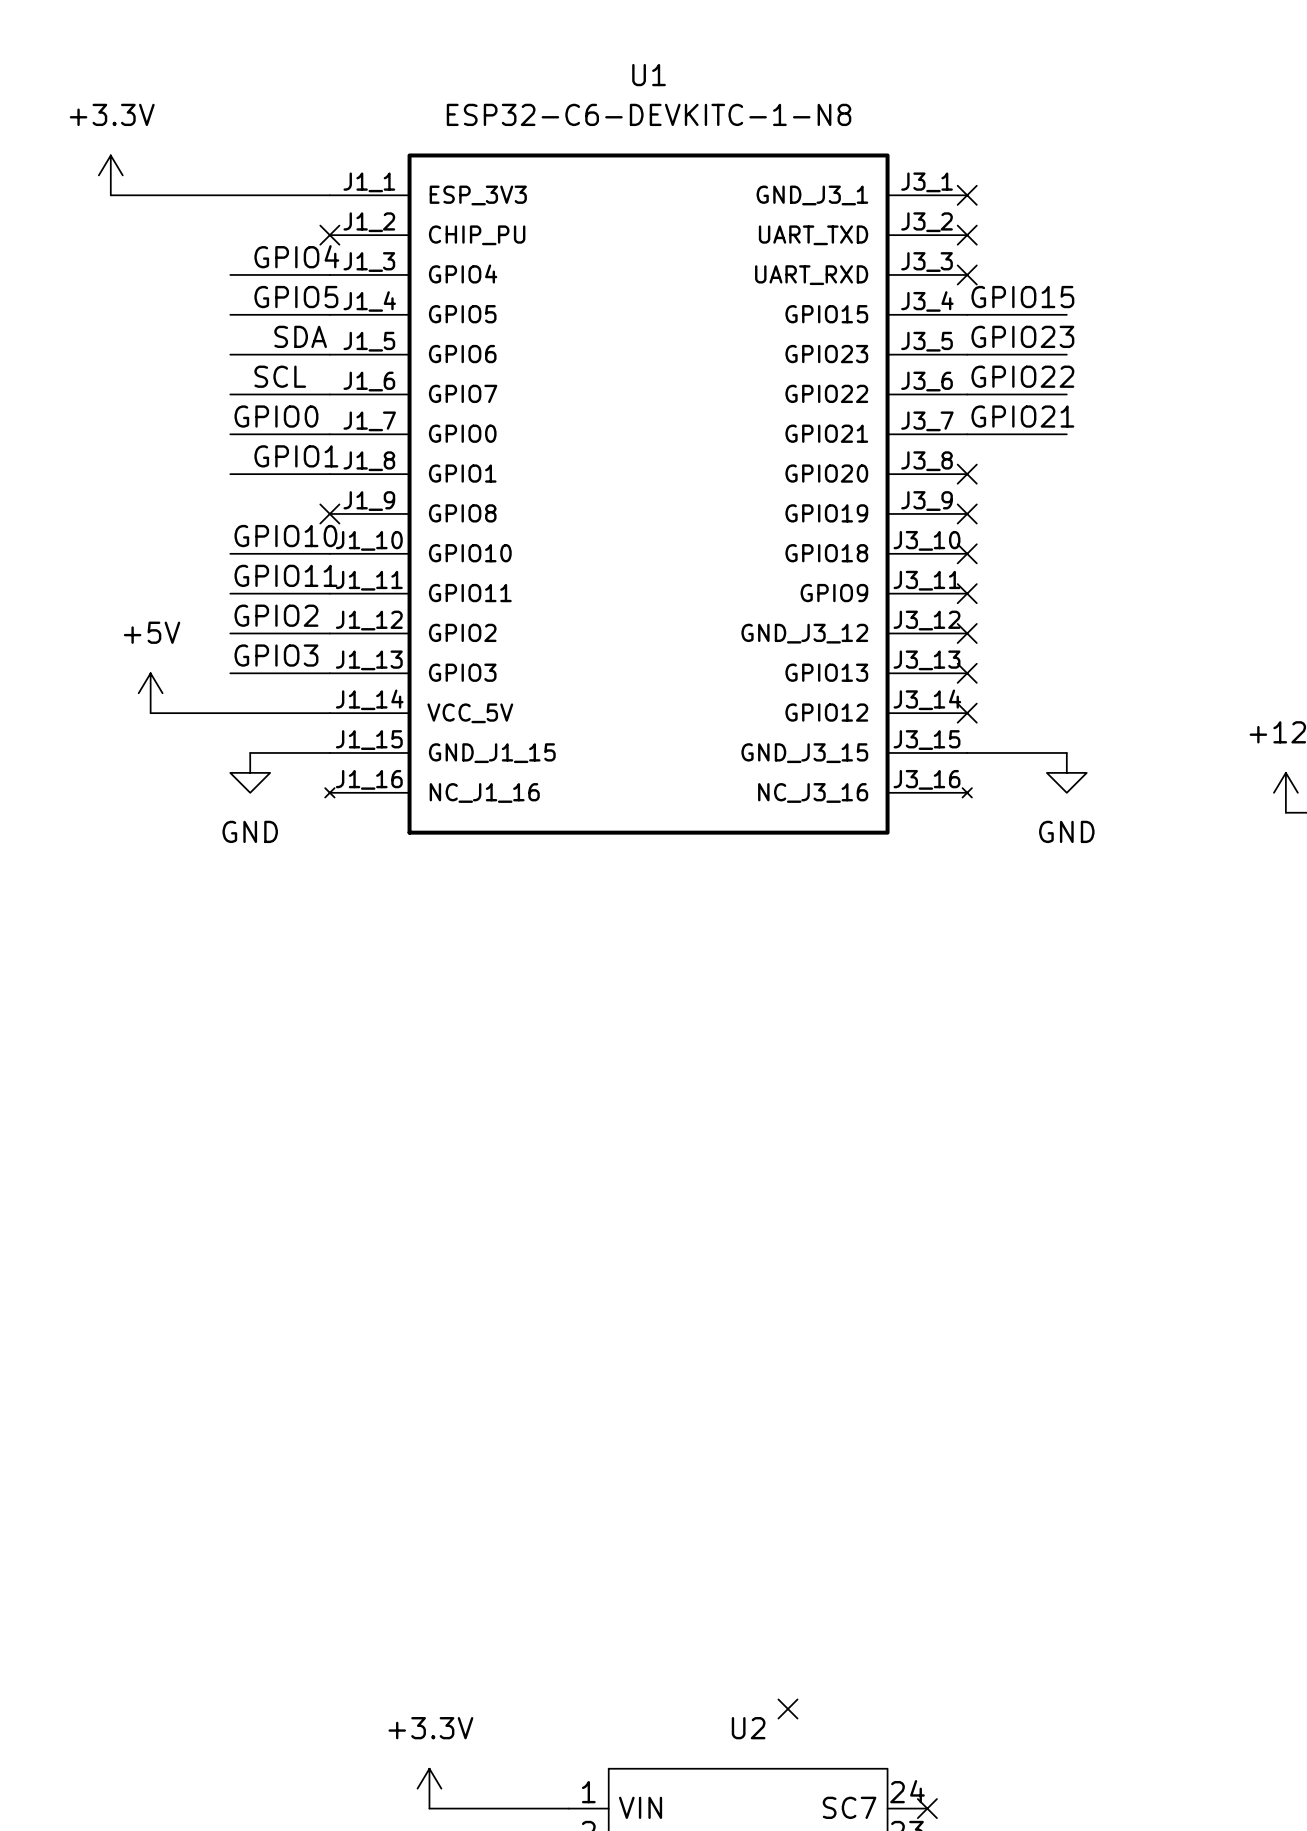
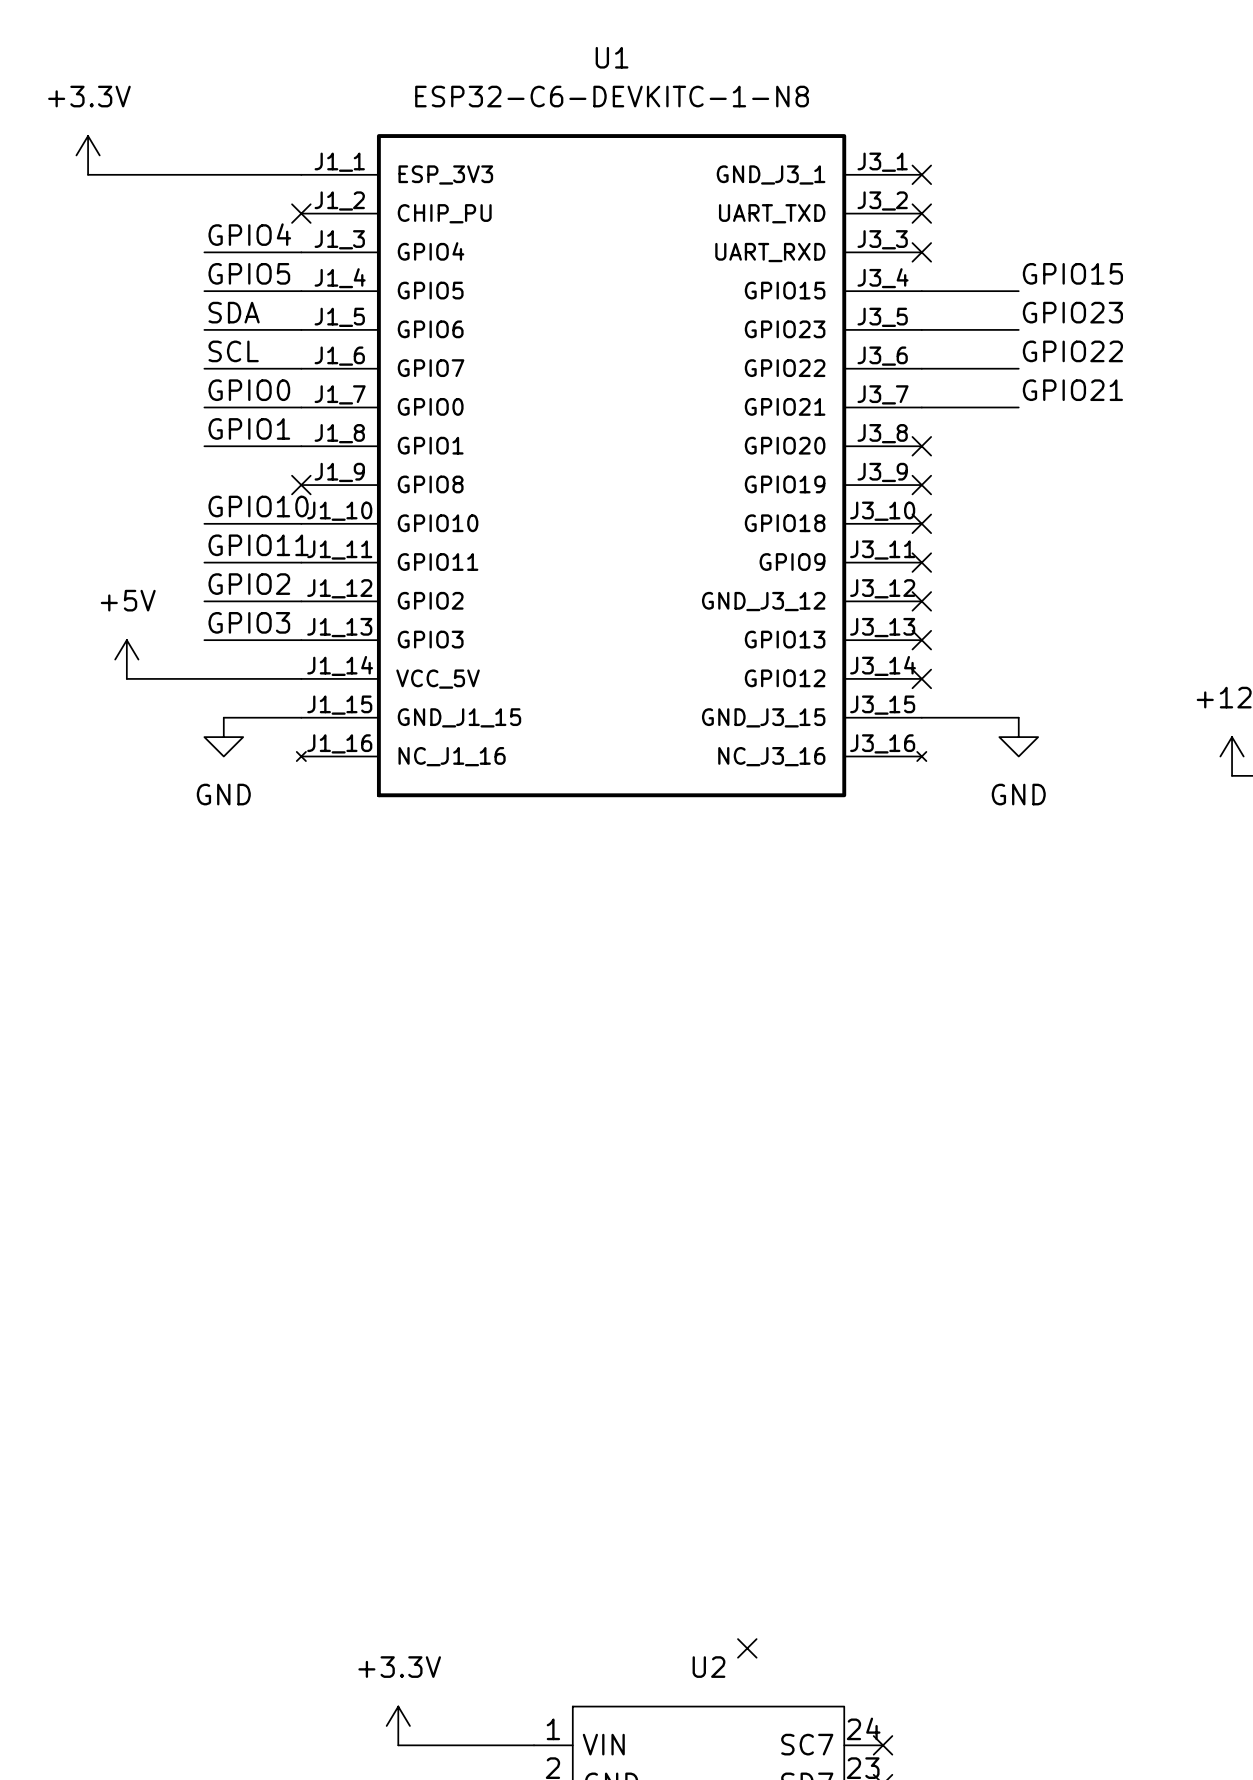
label position: GPIO4 (296, 256) -> GPIO4 (249, 234)
label position: GPIO5 (296, 297) -> GPIO5 (249, 273)
label position: GPIO15 (1022, 297) -> GPIO15 (1072, 273)
label position: SDA (300, 336) -> SDA (234, 312)
label position: GPIO23 (1022, 336) -> GPIO23 (1072, 312)
label position: SCL (280, 376) -> SCL (233, 351)
label position: GPIO22 (1022, 376) -> GPIO22 (1072, 351)
label position: GPIO21 (1022, 416) -> GPIO21 (1072, 390)
label position: GPIO1 (296, 456) -> GPIO1 (249, 428)

